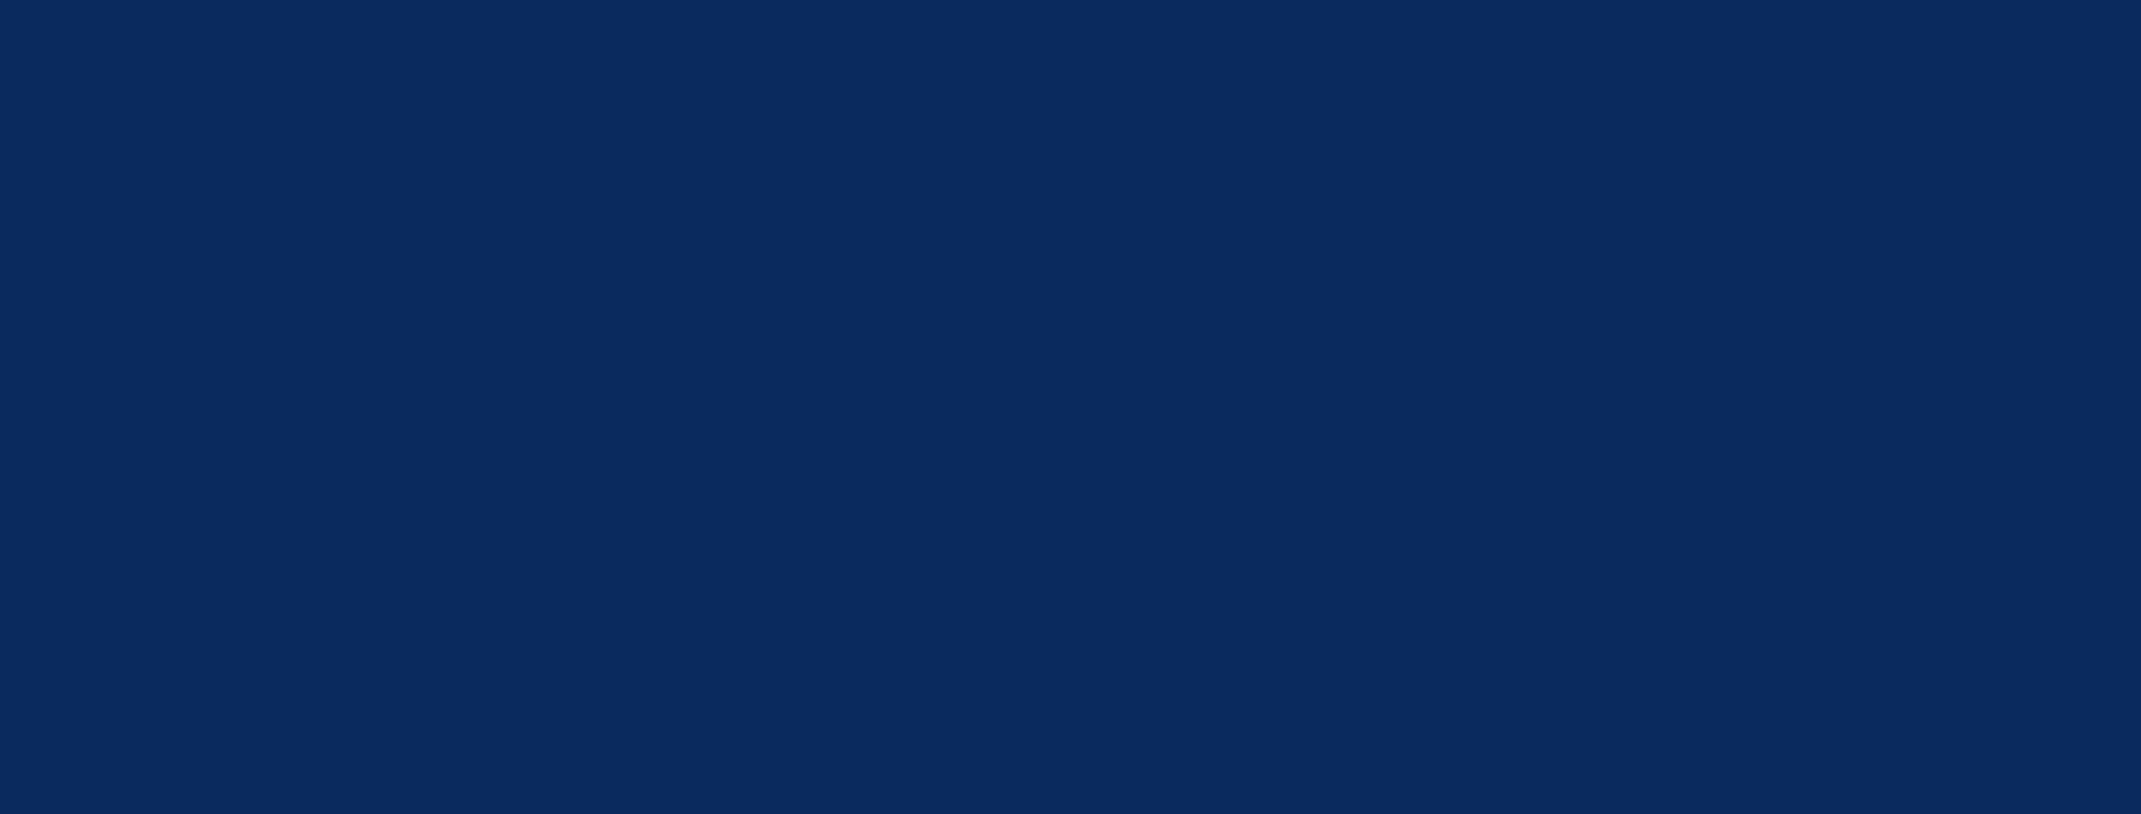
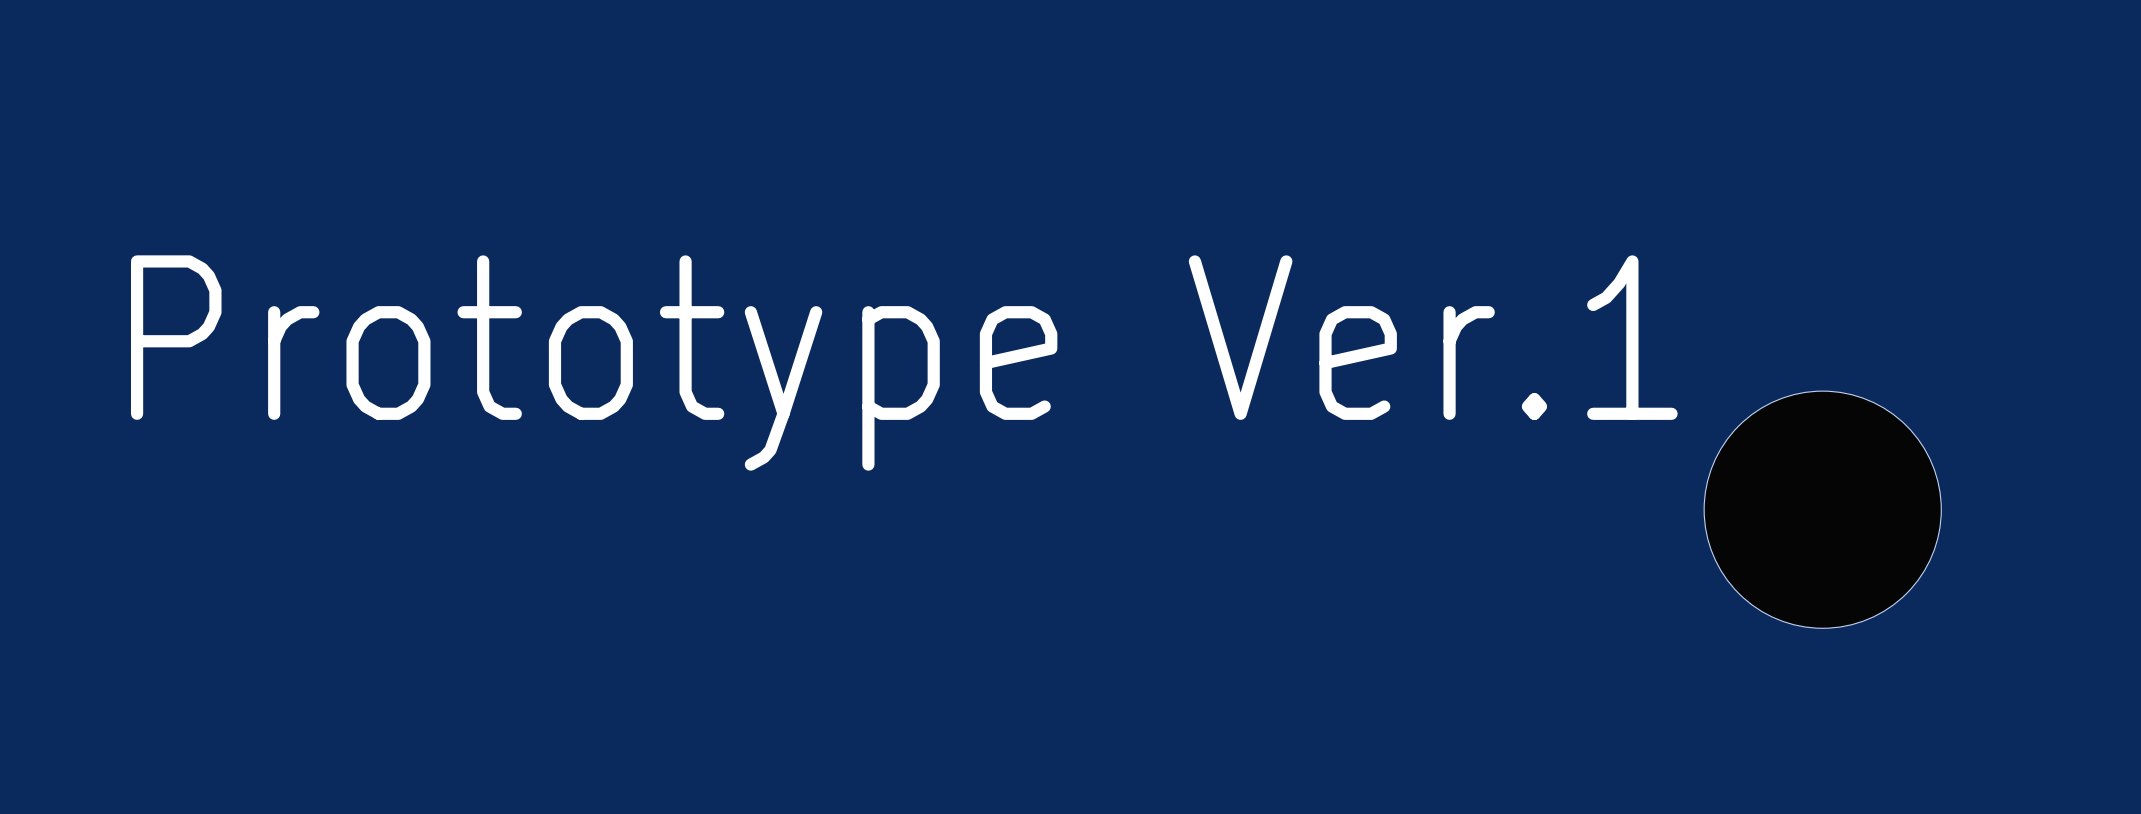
text: none -> Prototype Ver.1 (904, 363)
hole: none -> (1822, 509)

